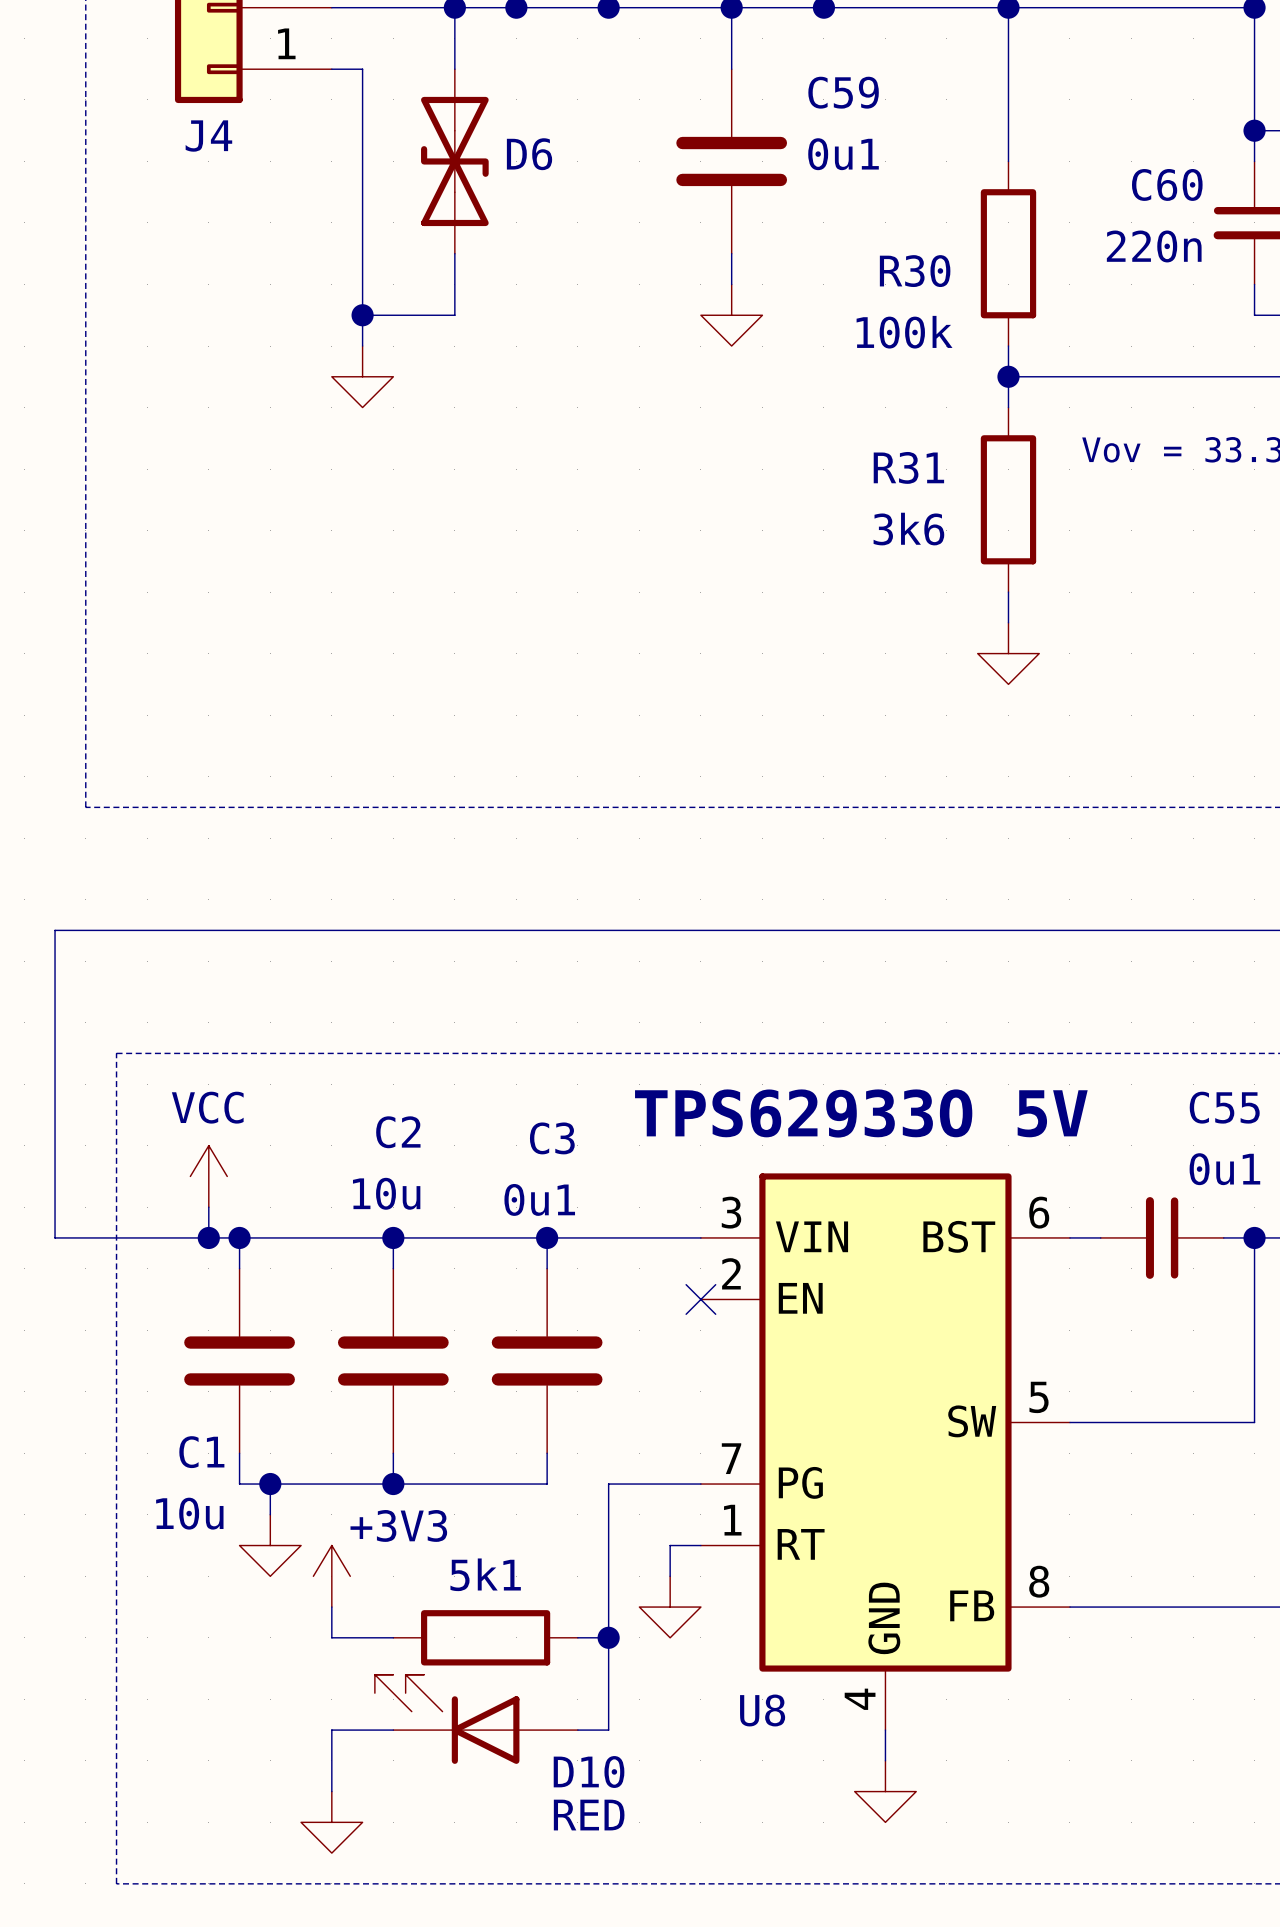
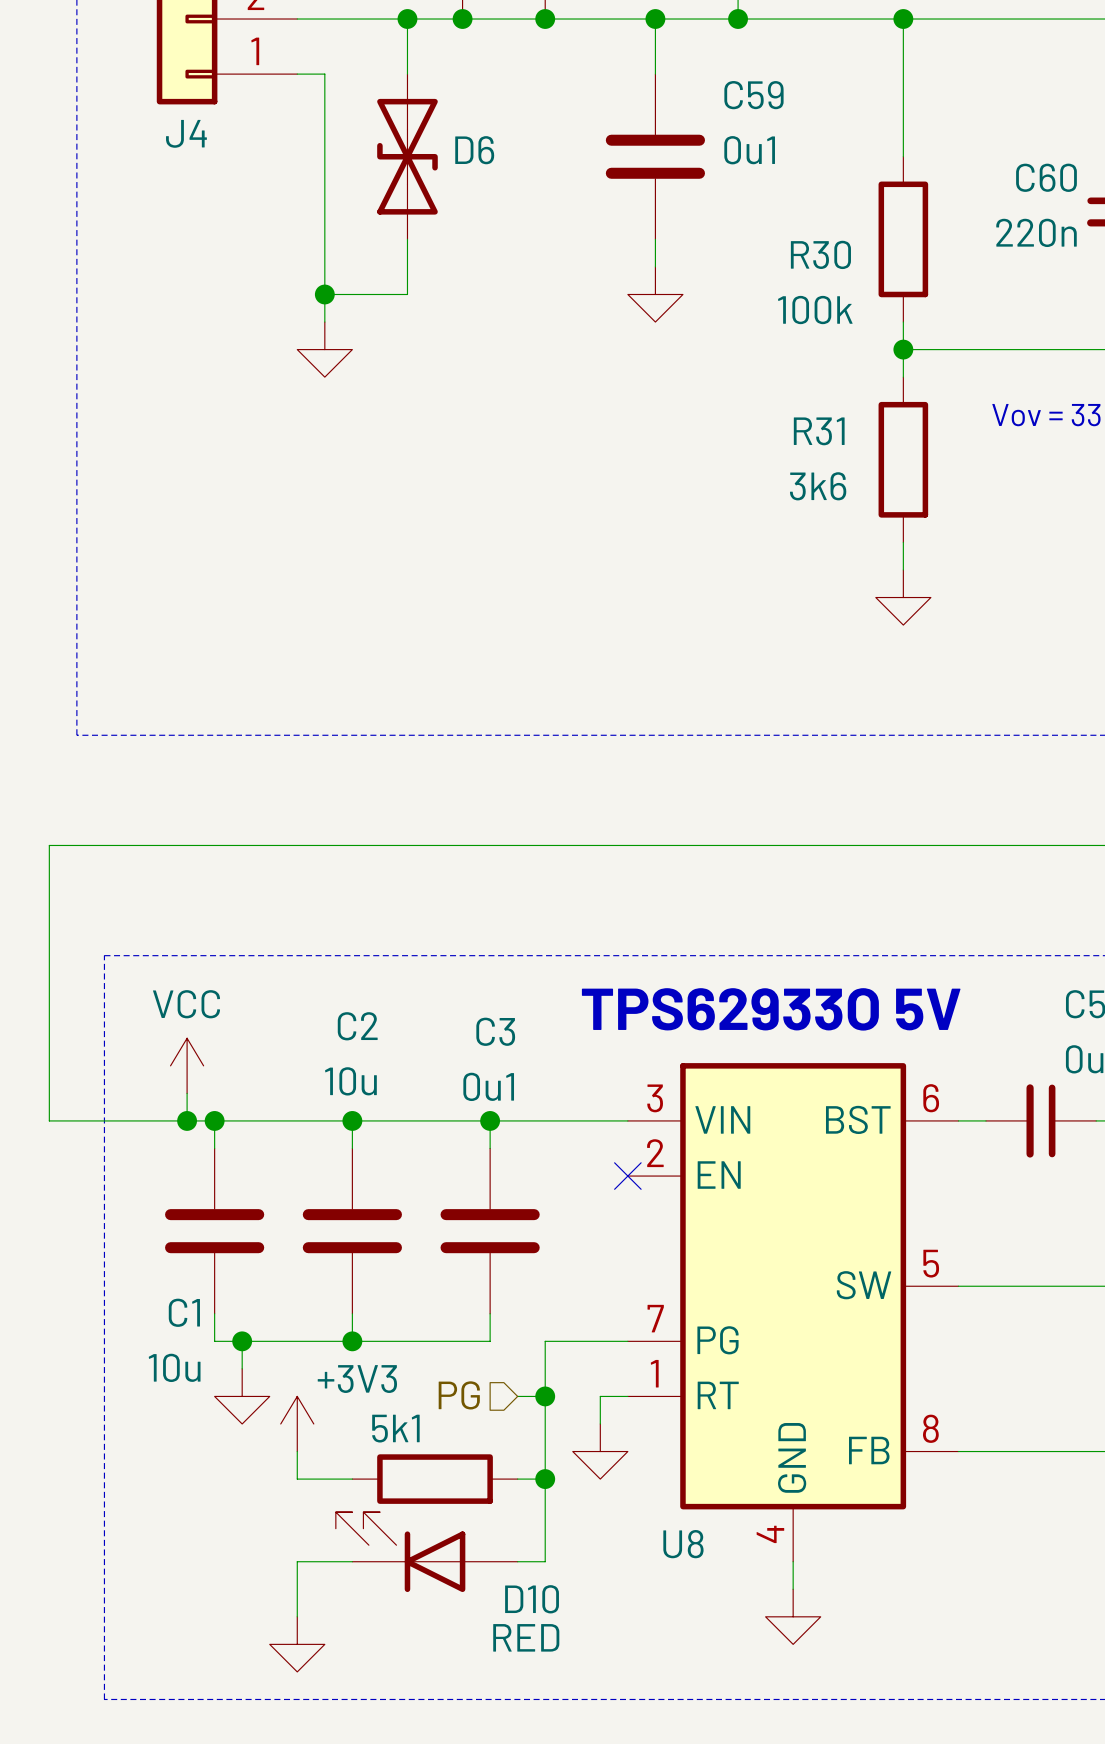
hierarchical label: none -> PG (459, 1395)
wire: none -> (517, 1396) (545, 1396)
junction: none -> (545, 1396)
part value position: 5k1 (485, 1574) -> 5k1 (395, 1428)

